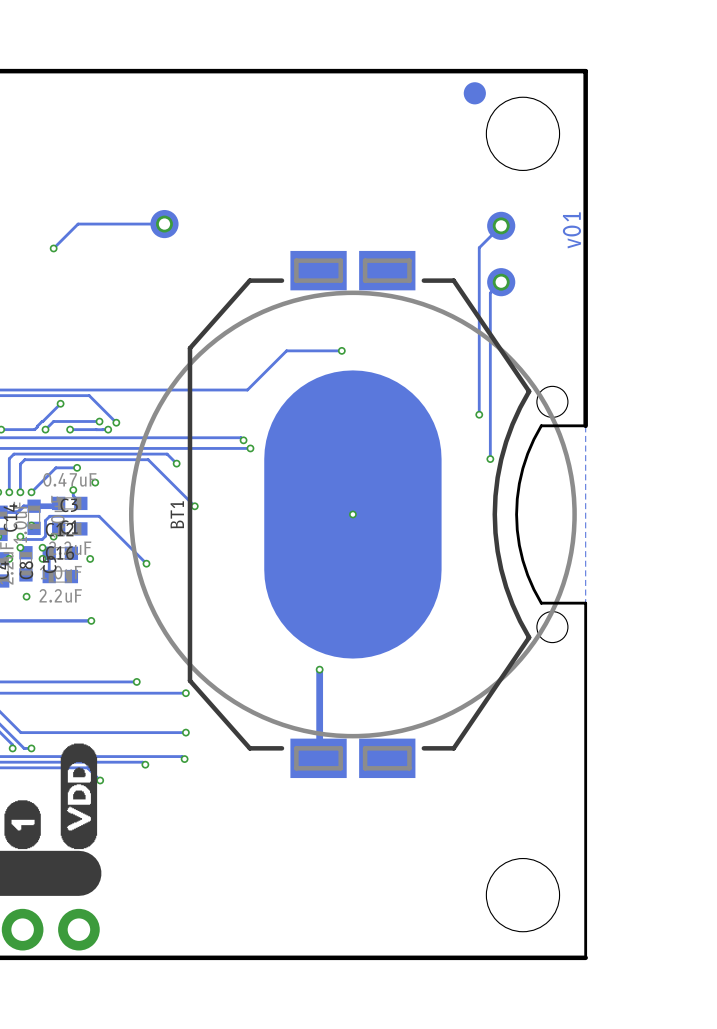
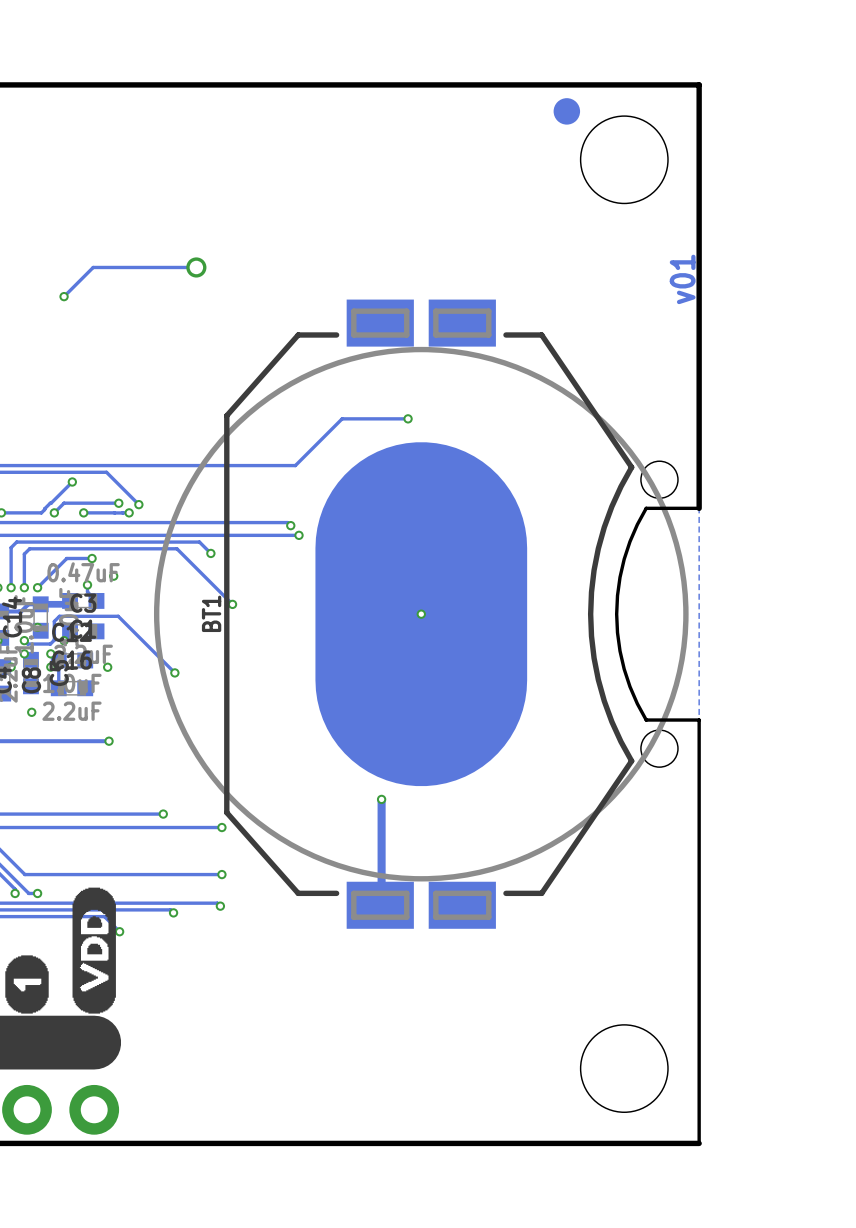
part: (164, 224) -> none
track: (501, 225) (479, 247) (479, 414) -> none
part: (501, 225) -> none
via: (501, 225) -> none
track: (501, 282) (490, 293) (490, 459) -> none
part: (501, 282) -> none
via: (501, 282) -> none
via: (479, 414) -> none
via: (490, 459) -> none

